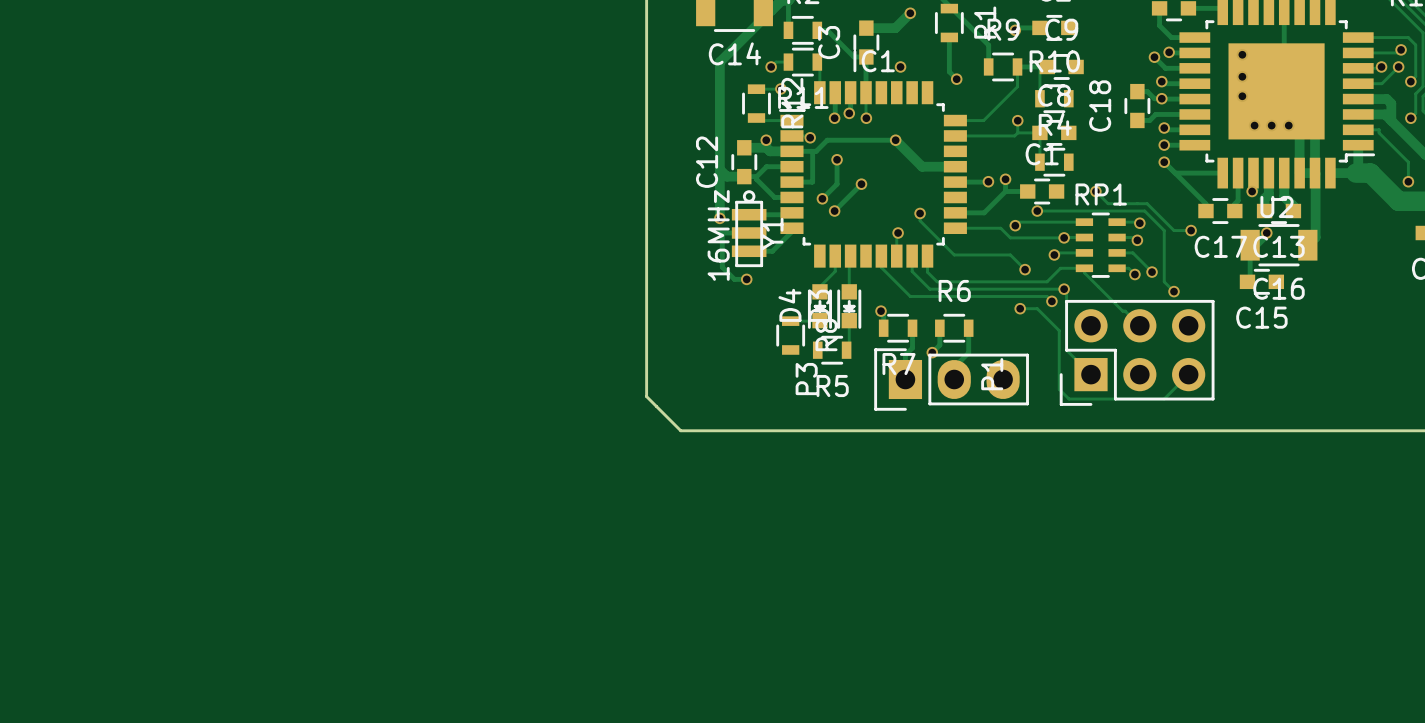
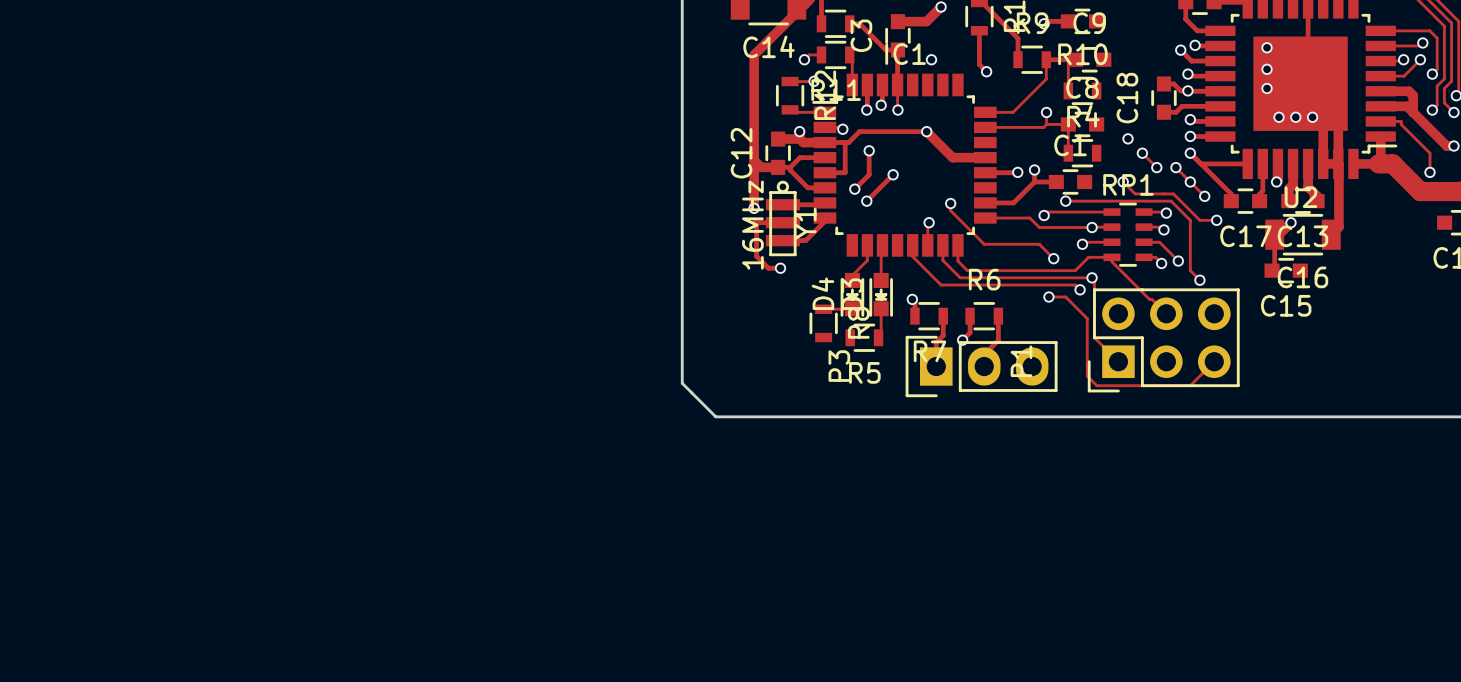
via: none -> (1128, 138)
track: none -> (1142, 153) (1156, 167)
via: none -> (1142, 153)
via: none -> (1156, 167)
track: none -> (1175, 167) (1204, 196)
via: none -> (1175, 167)
via: none -> (1190, 181)
via: none -> (1204, 196)

